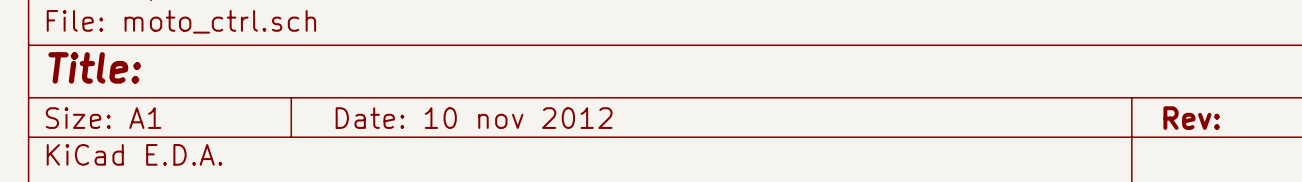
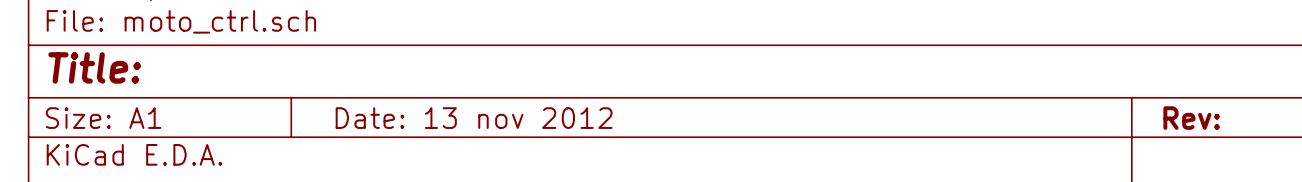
title block: Date: 10 nov 2012 (474, 118) -> Date: 13 nov 2012 (474, 118)

